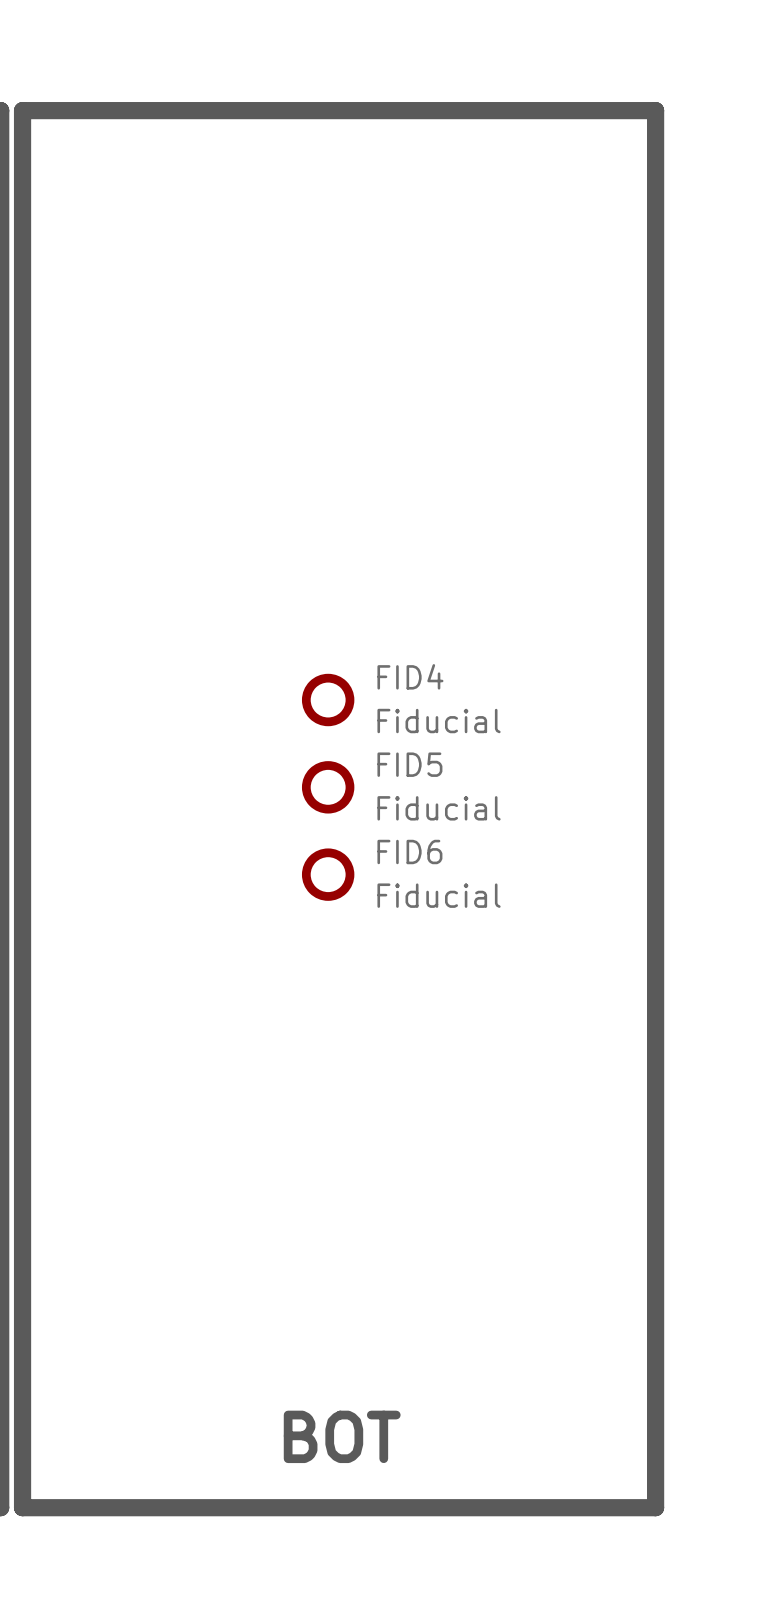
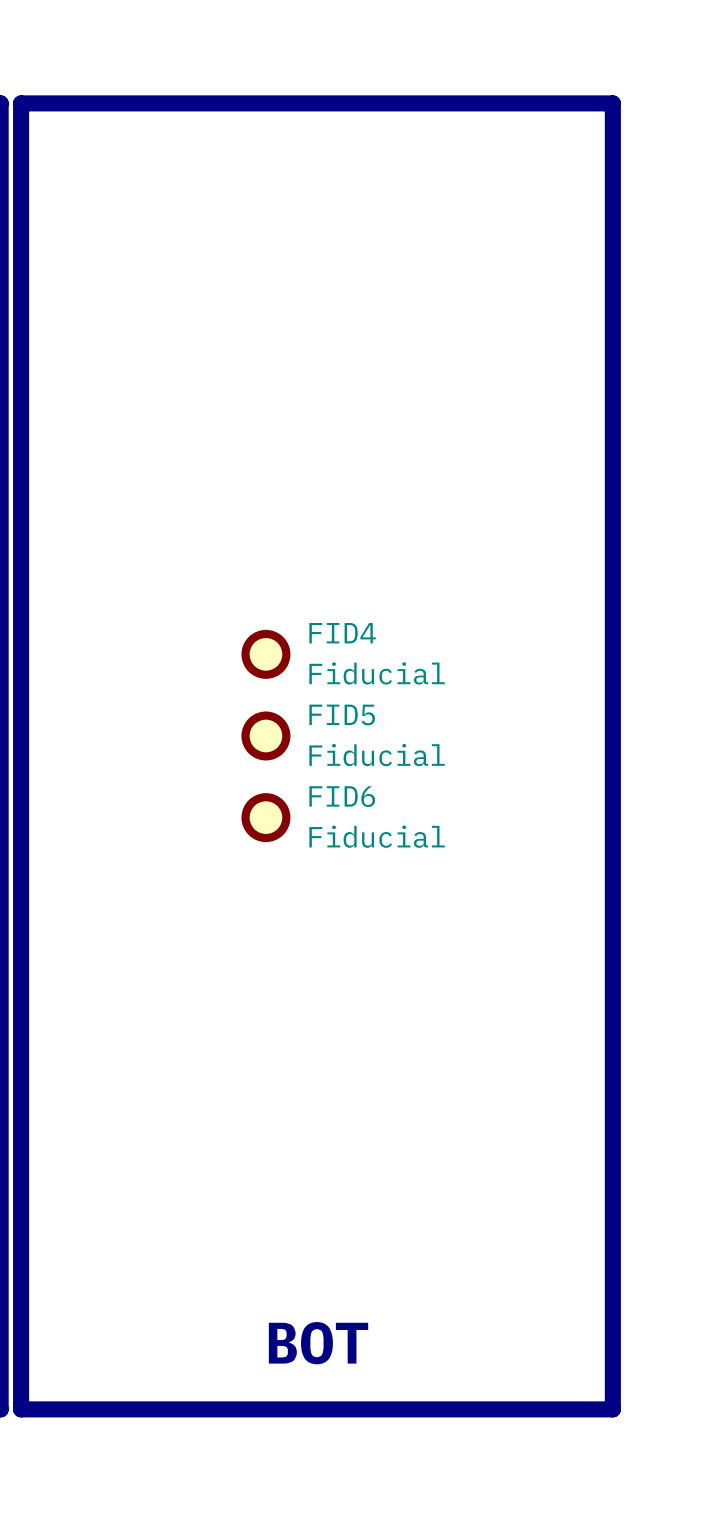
FID4 position: (328, 700) -> (265, 654)
FID5 position: (328, 787) -> (265, 735)
FID6 position: (328, 874) -> (265, 817)

